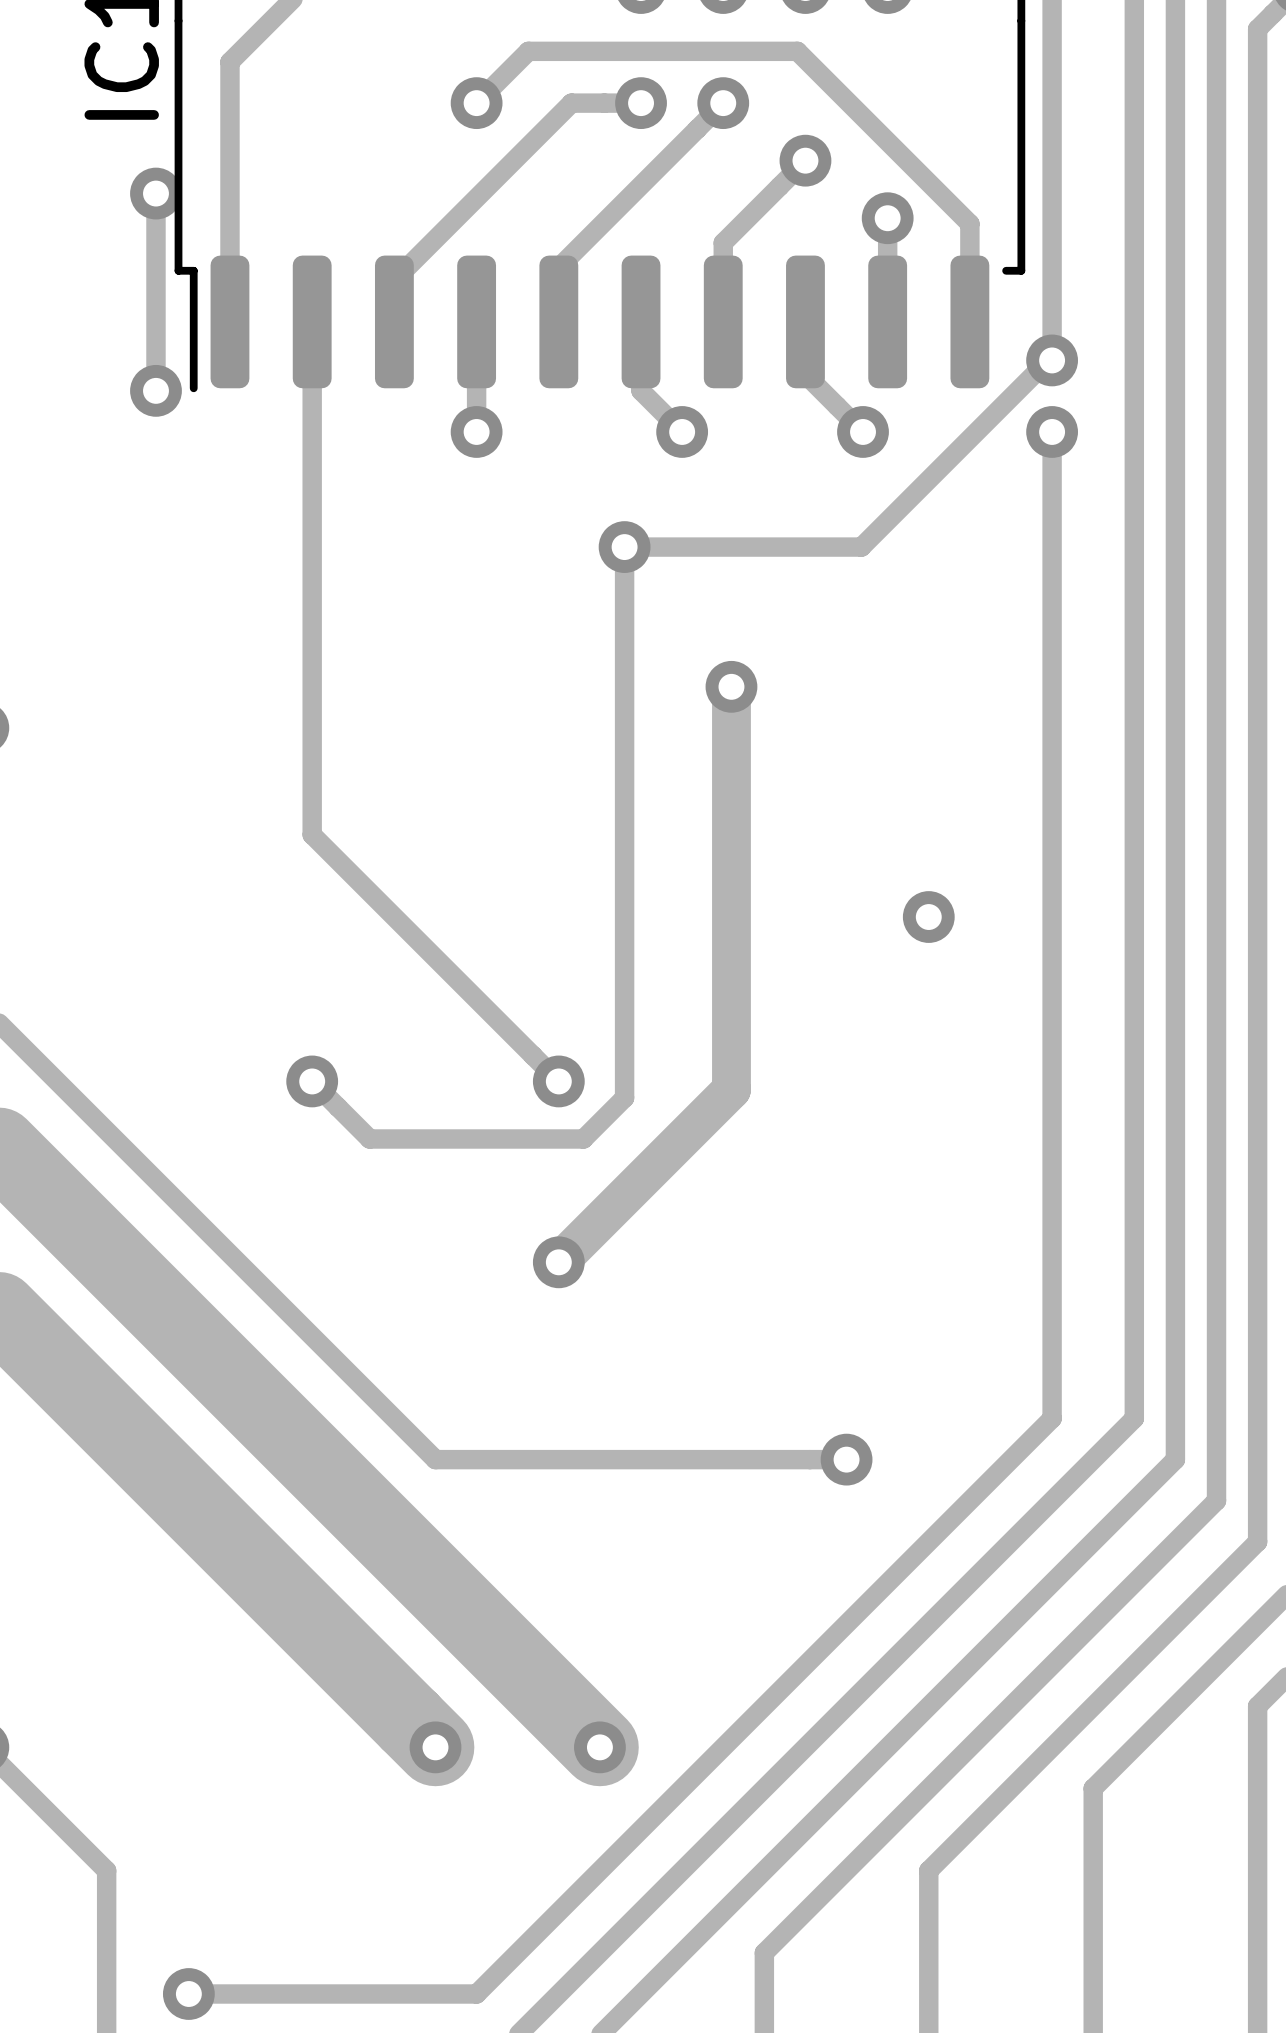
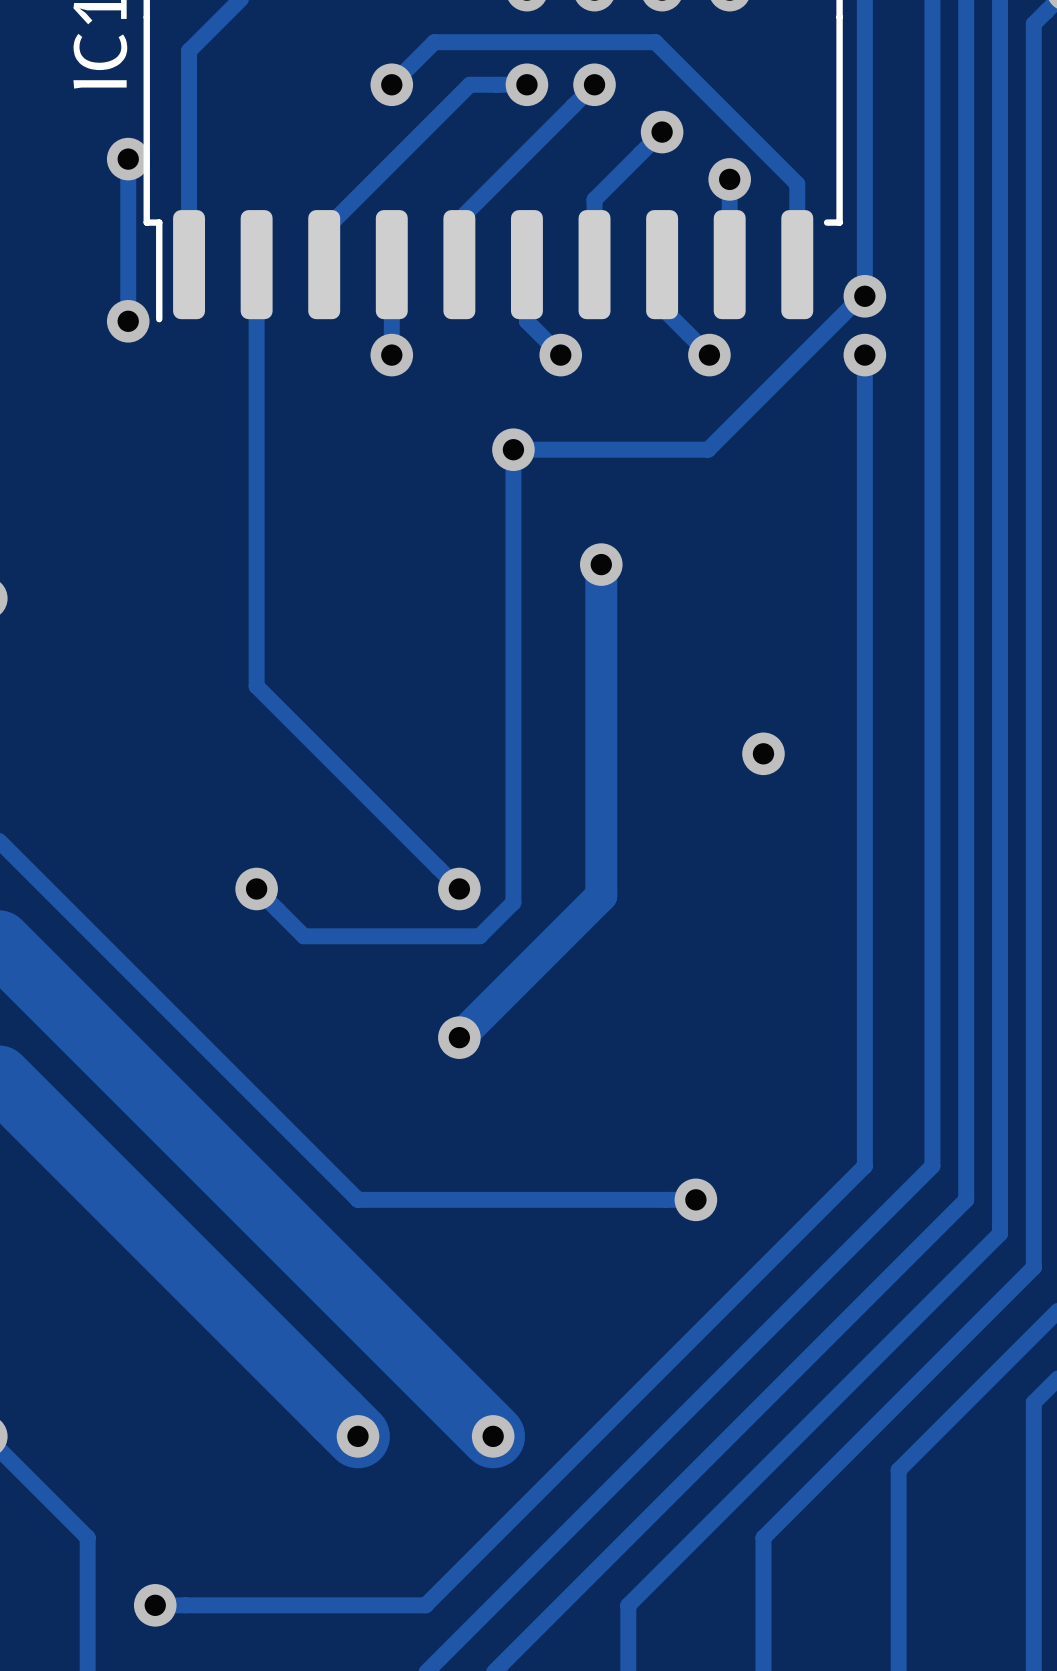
track: (517, 1952) (476, 1994) (188, 1994) -> (425, 1605) (155, 1605)
via position: (188, 1994) -> (155, 1605)

